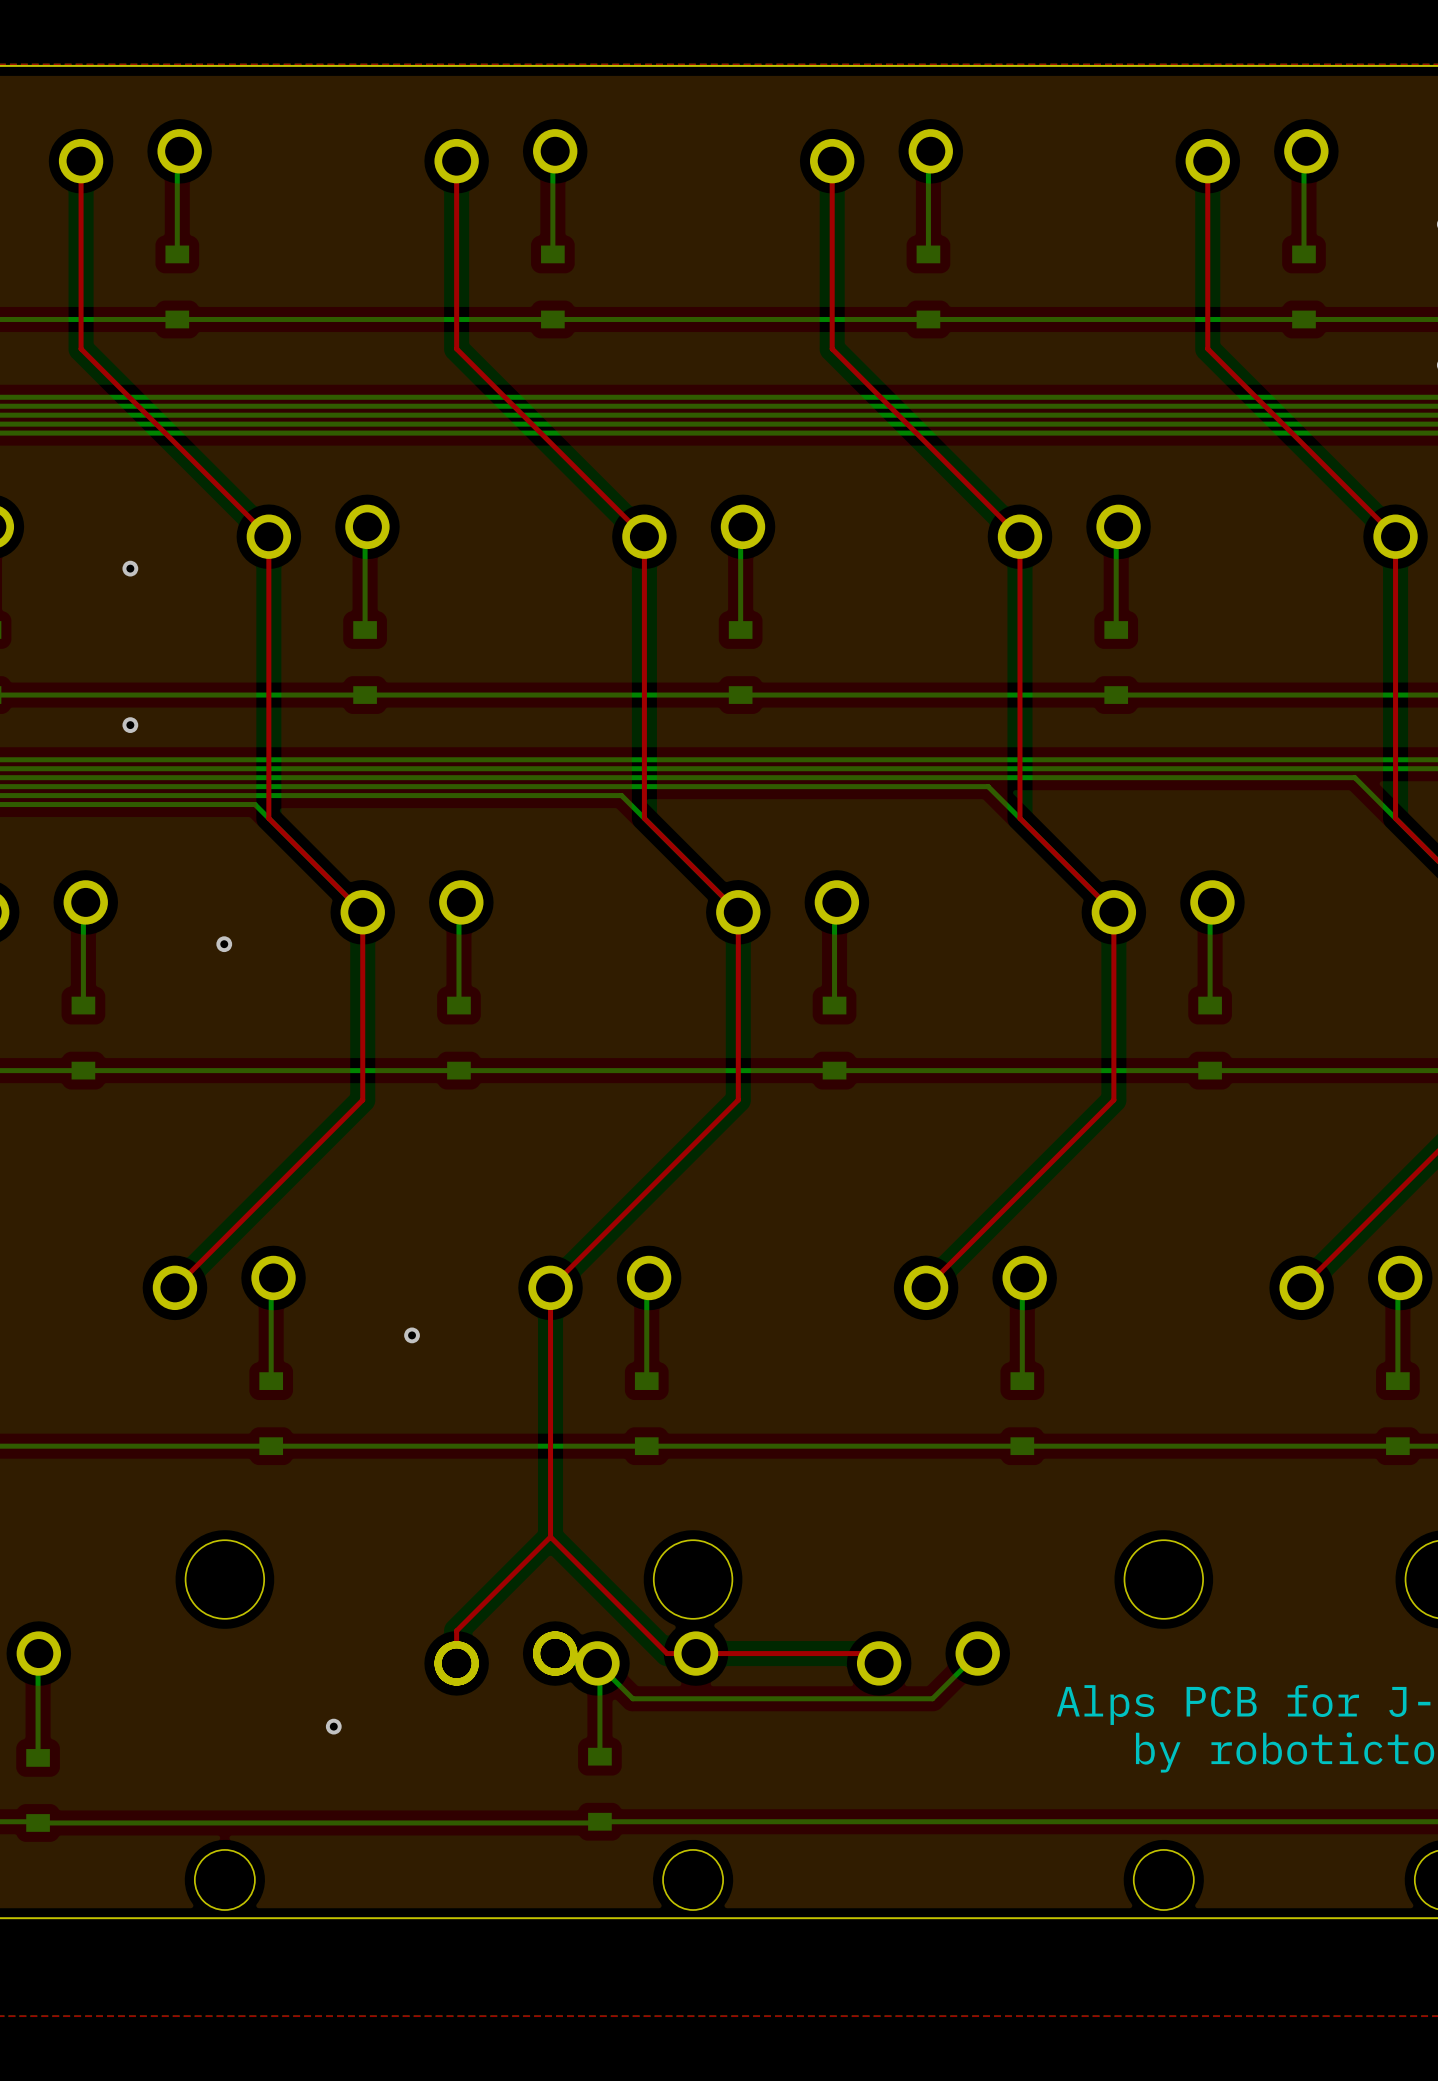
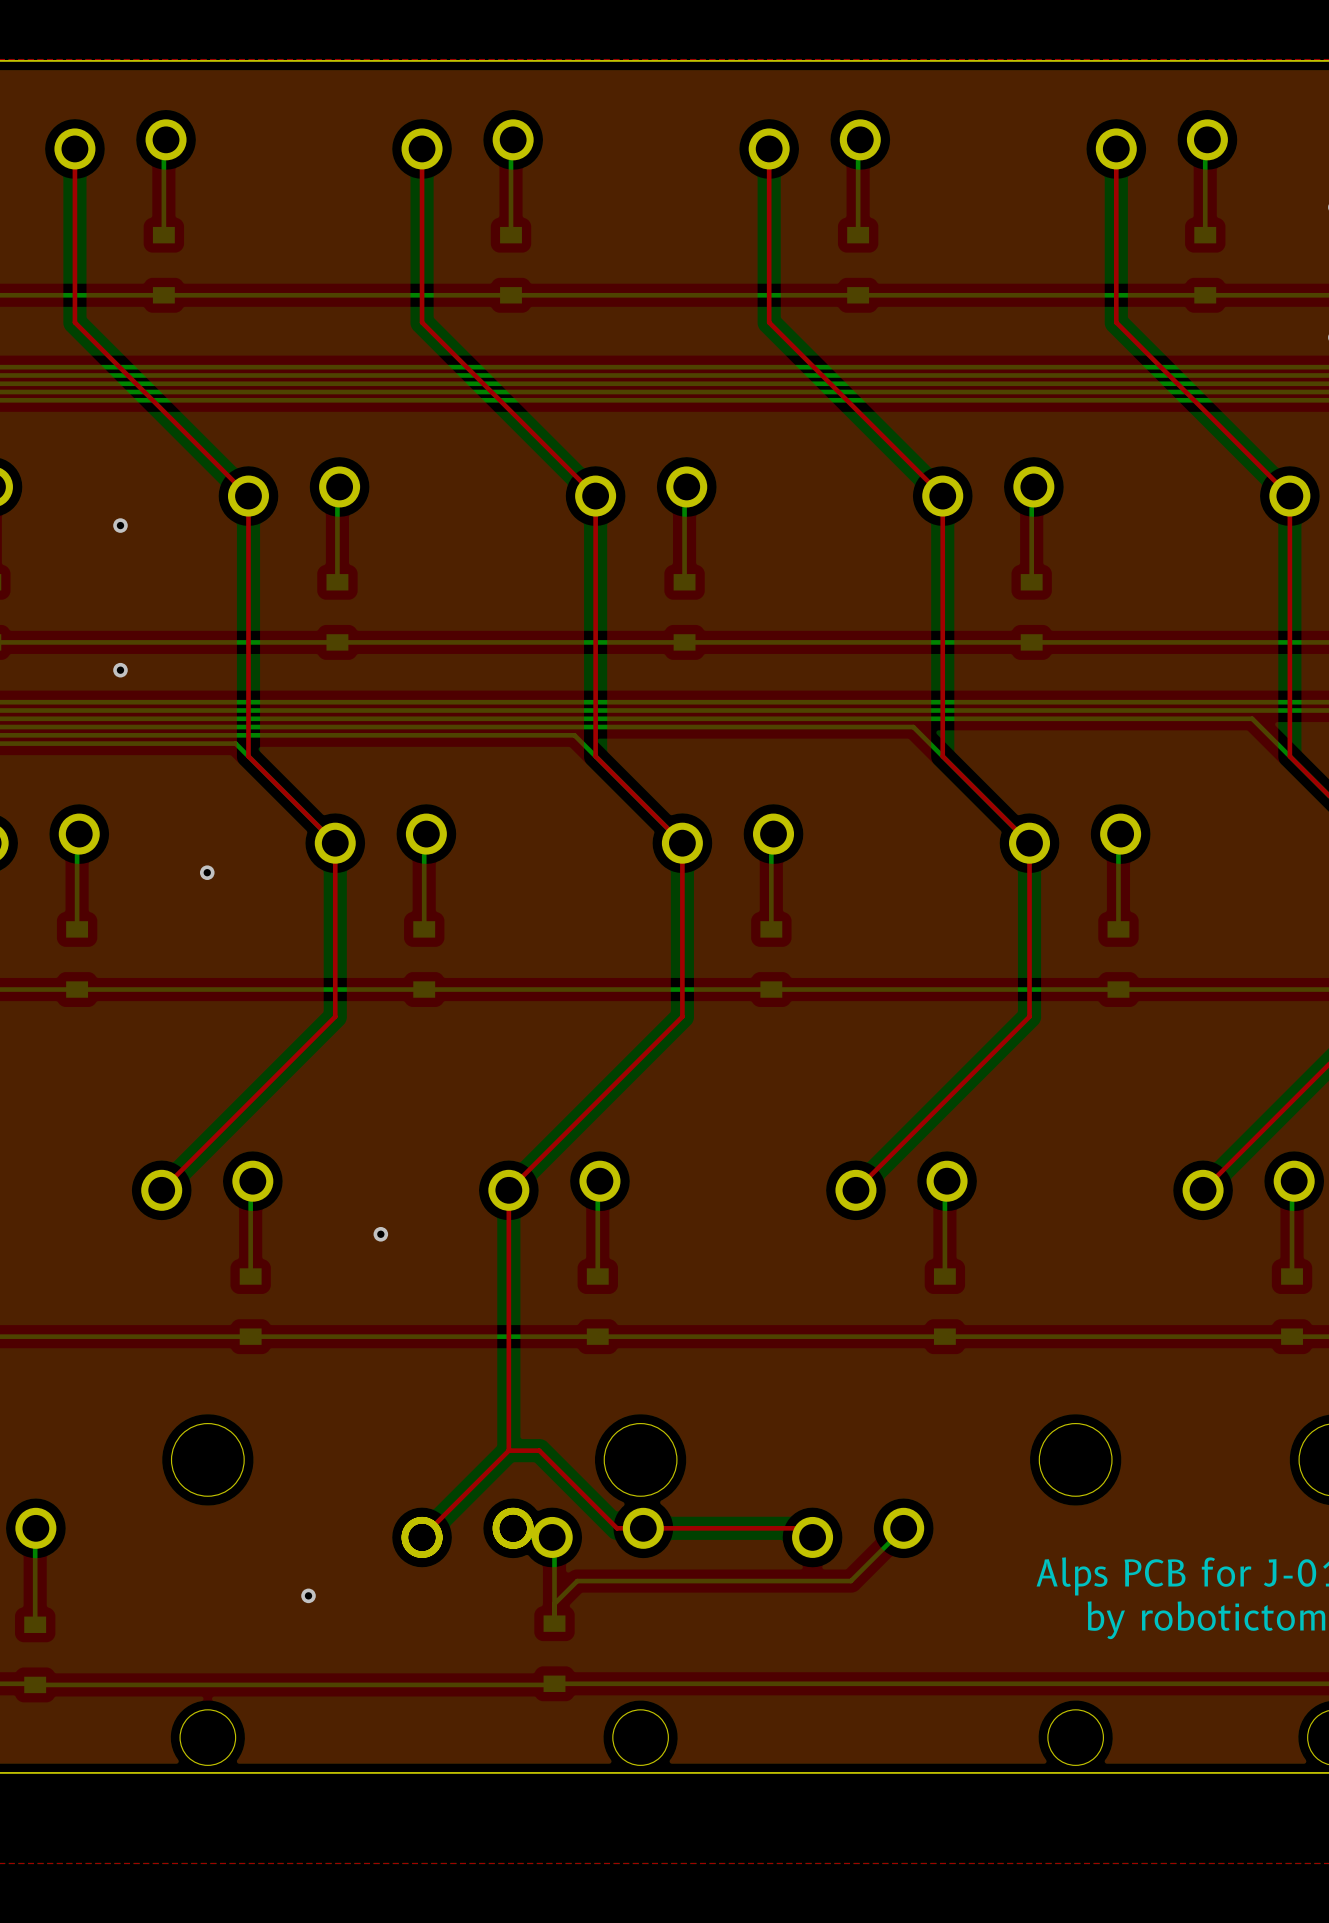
top track: none -> (508, 1420) (508, 1450)
top track: none -> (508, 1450) (422, 1537)
top track: (667, 1653) (550, 1536) (456, 1630) (456, 1663) -> (617, 1528) (539, 1450) (508, 1450)
bottom track: (599, 1665) (632, 1698) (932, 1698) -> (554, 1603) (577, 1581) (850, 1581) (861, 1570)

